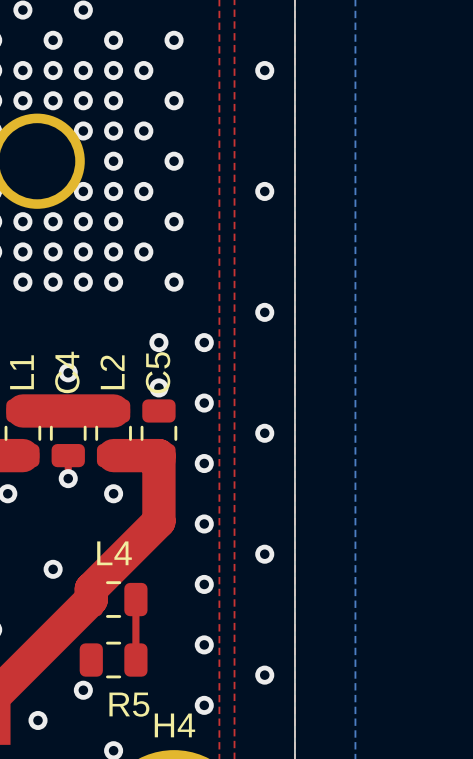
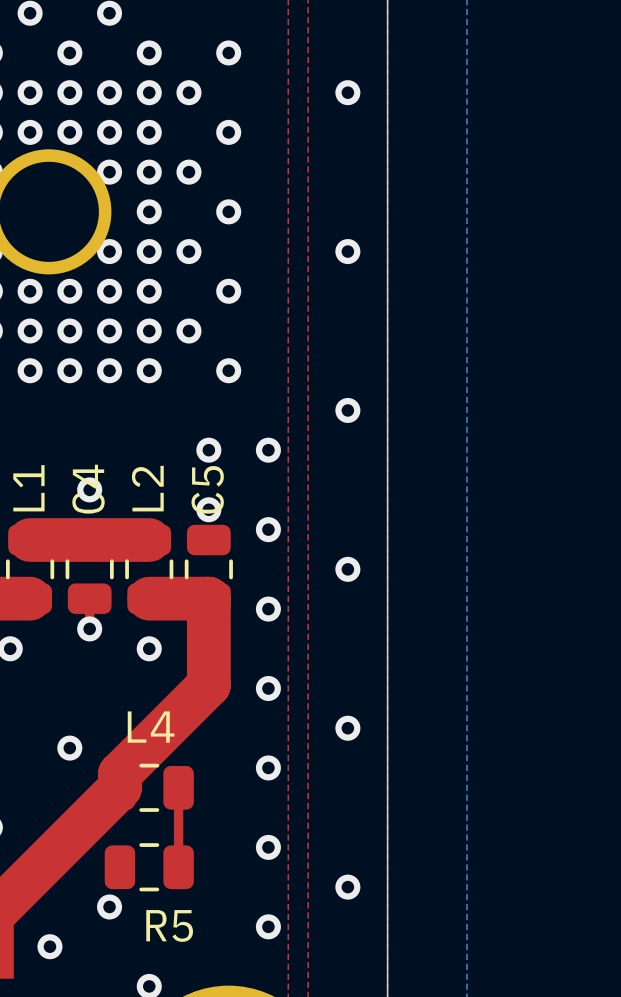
H4 name: H4 (174, 725) -> none

